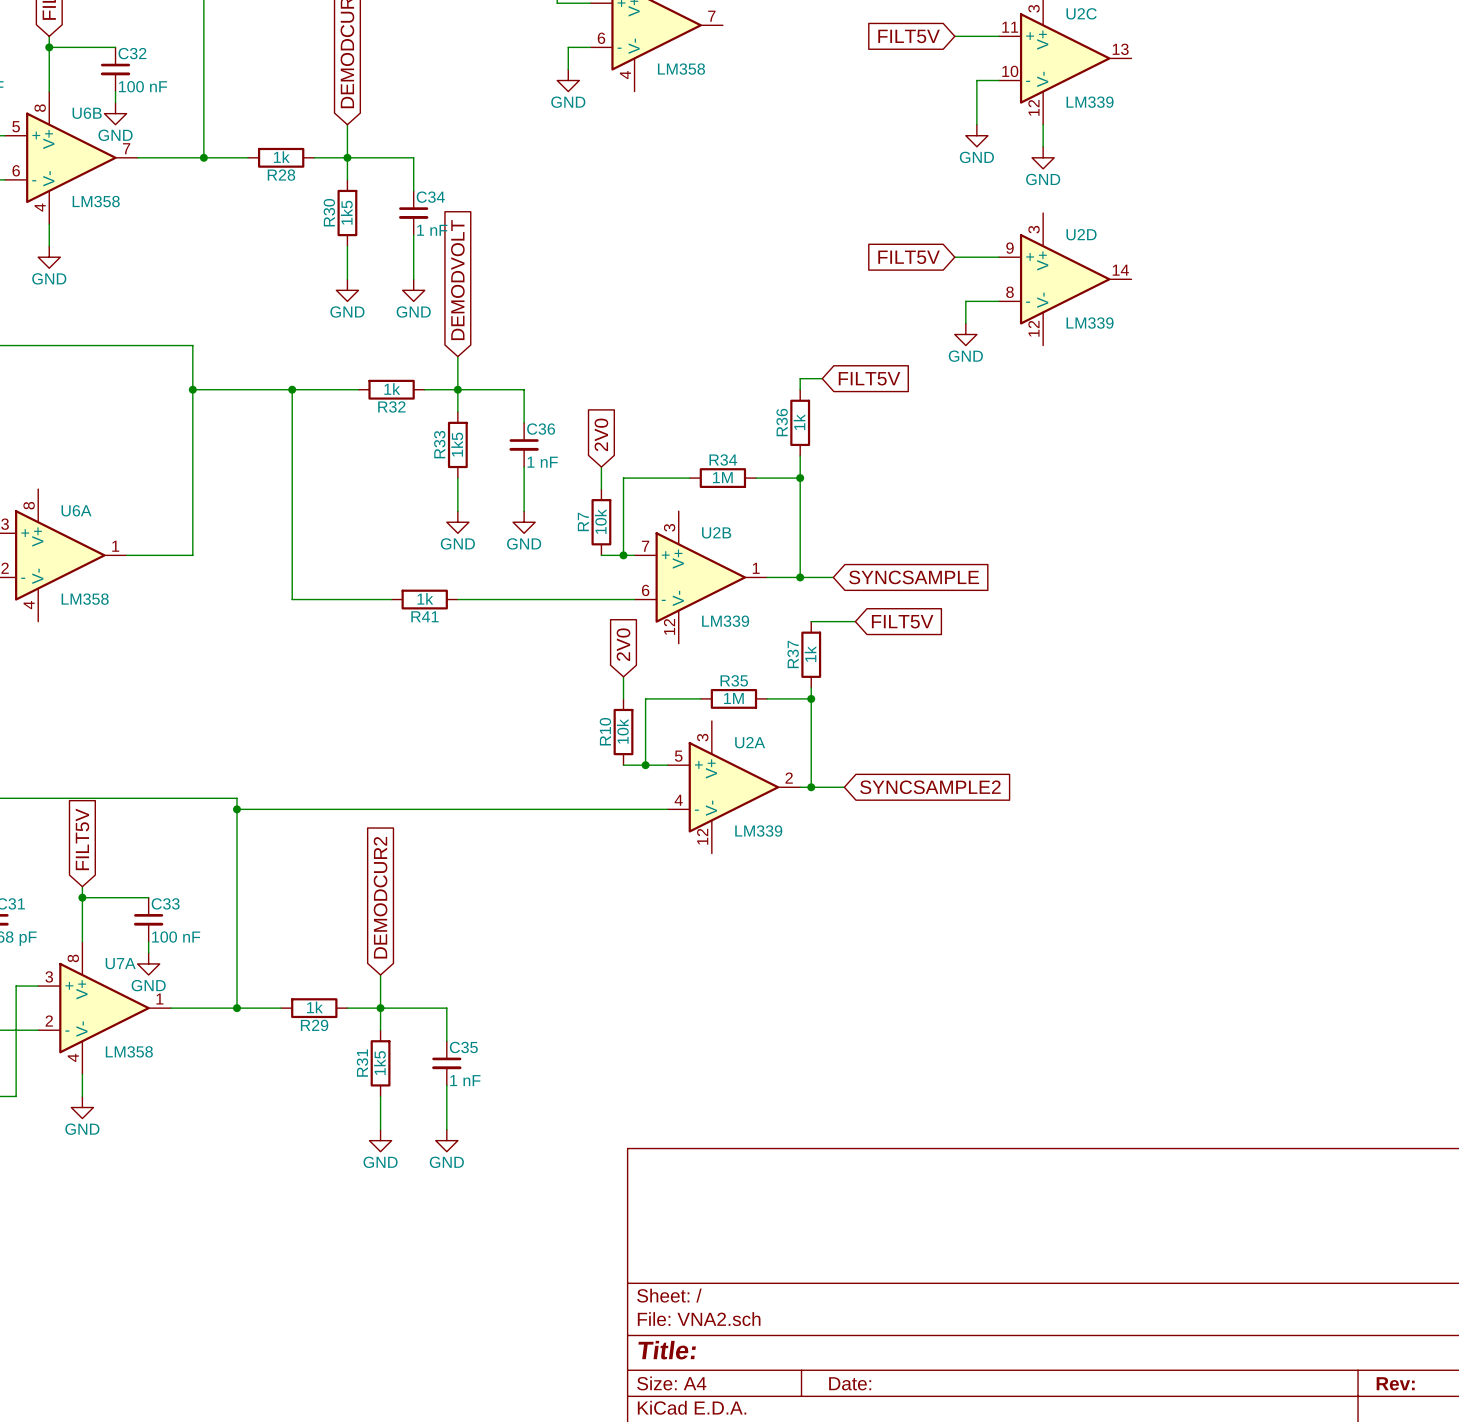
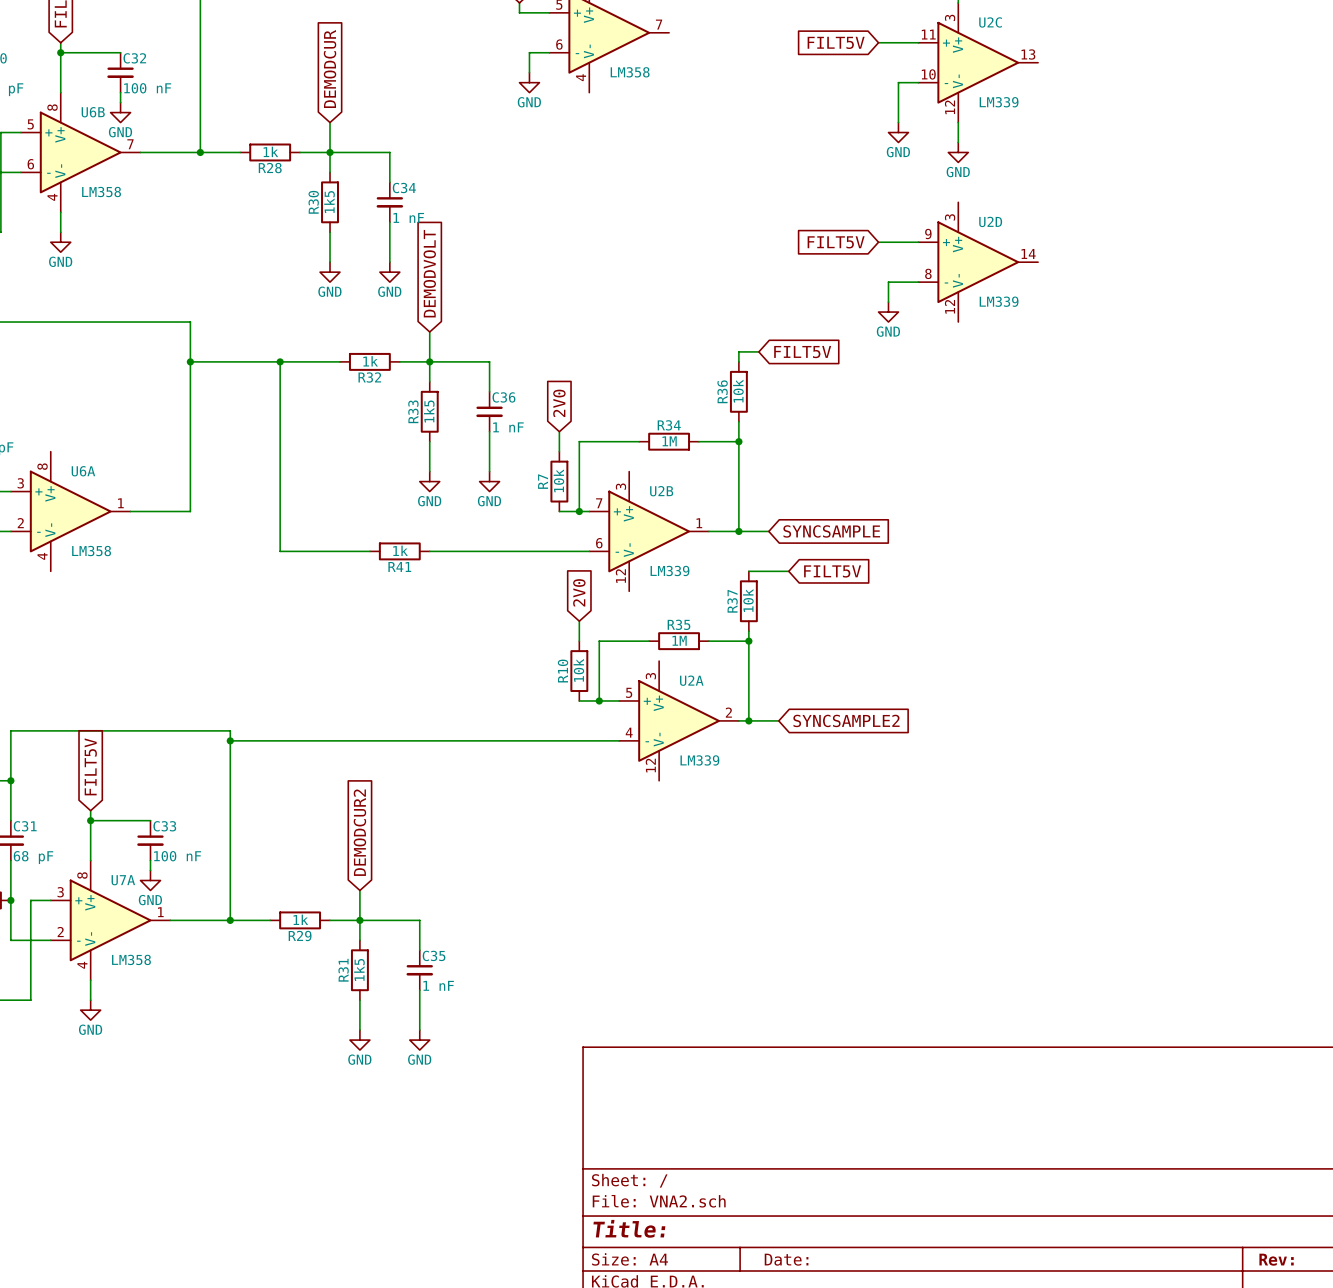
R36 value: 1k (799, 422) -> 10k (738, 391)
R37 value: 1k (810, 654) -> 10k (748, 600)

